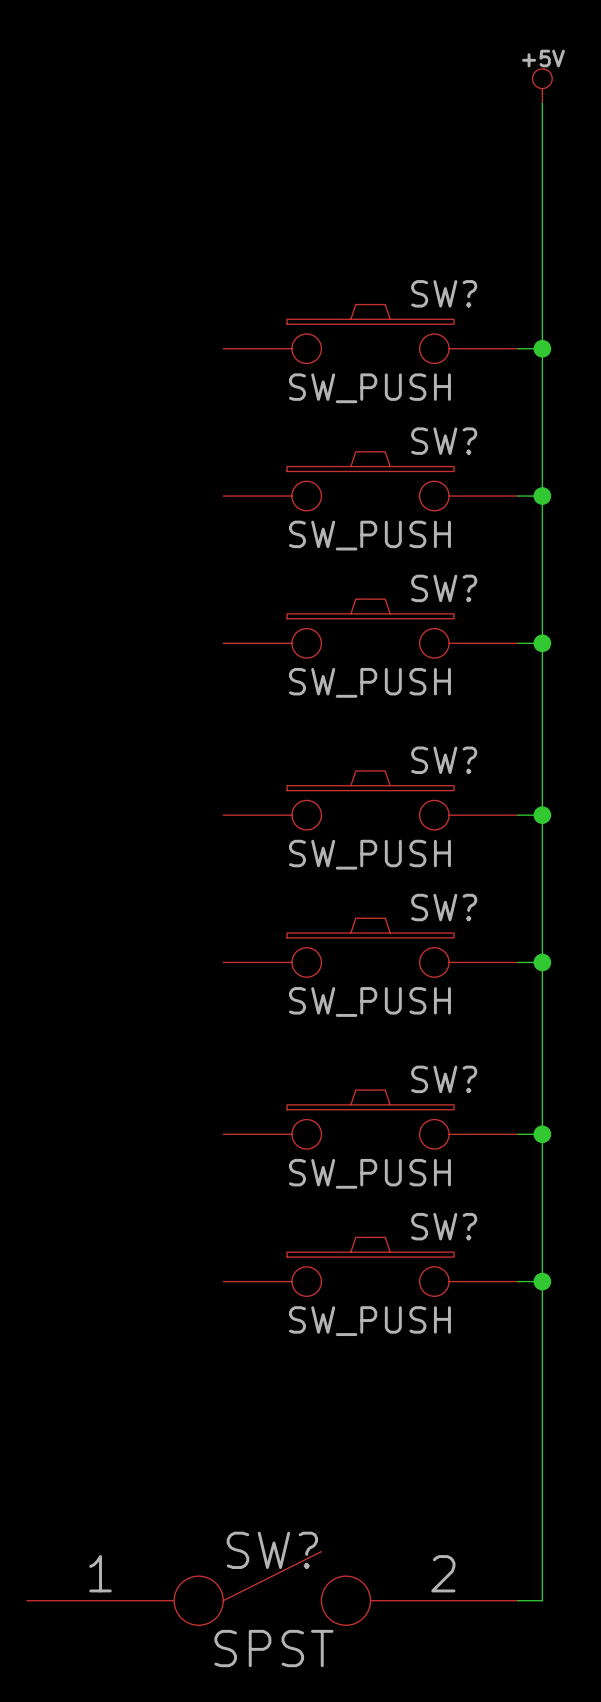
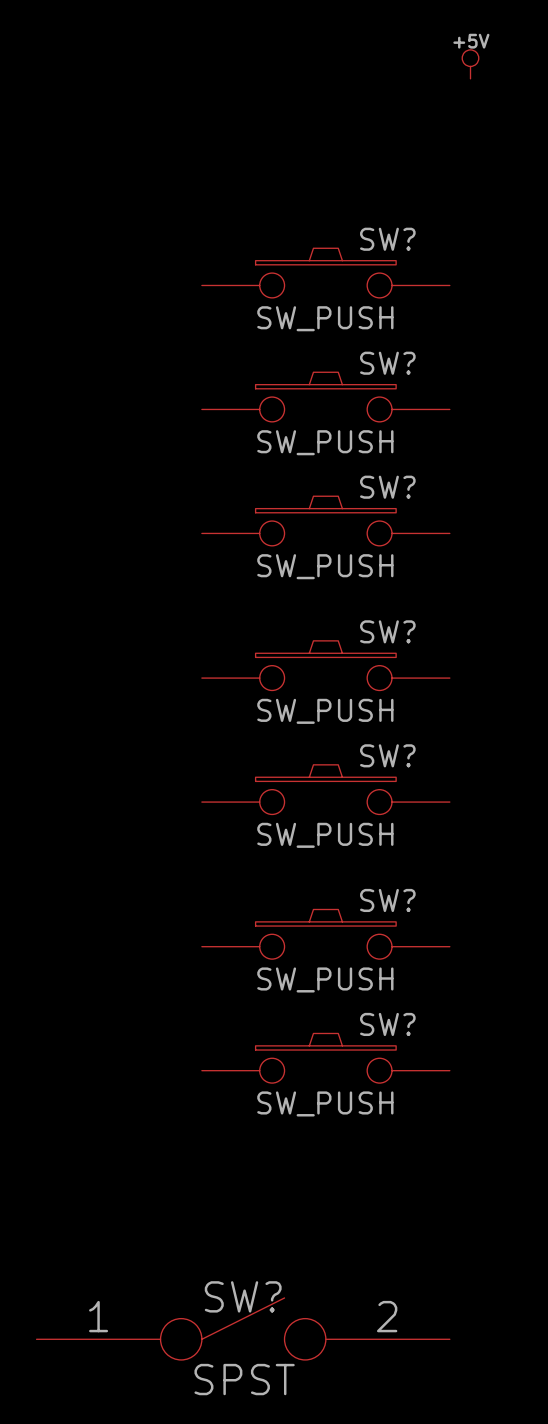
wire: (542, 103) (542, 1600) (517, 1600) -> none
wire: (517, 348) (542, 348) -> none
junction: (542, 348) -> none
wire: (517, 496) (542, 496) -> none
junction: (542, 496) -> none
wire: (517, 643) (542, 643) -> none
junction: (542, 643) -> none
wire: (517, 815) (542, 815) -> none
junction: (542, 815) -> none
wire: (517, 962) (542, 962) -> none
junction: (542, 962) -> none
wire: (517, 1134) (542, 1134) -> none
junction: (542, 1134) -> none
wire: (517, 1281) (542, 1281) -> none
junction: (542, 1281) -> none

